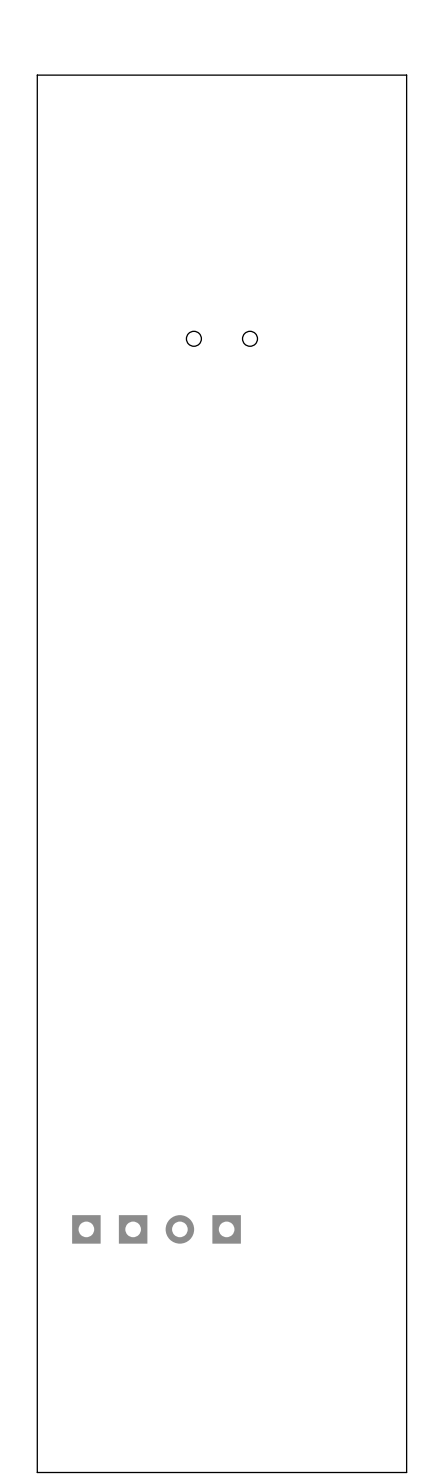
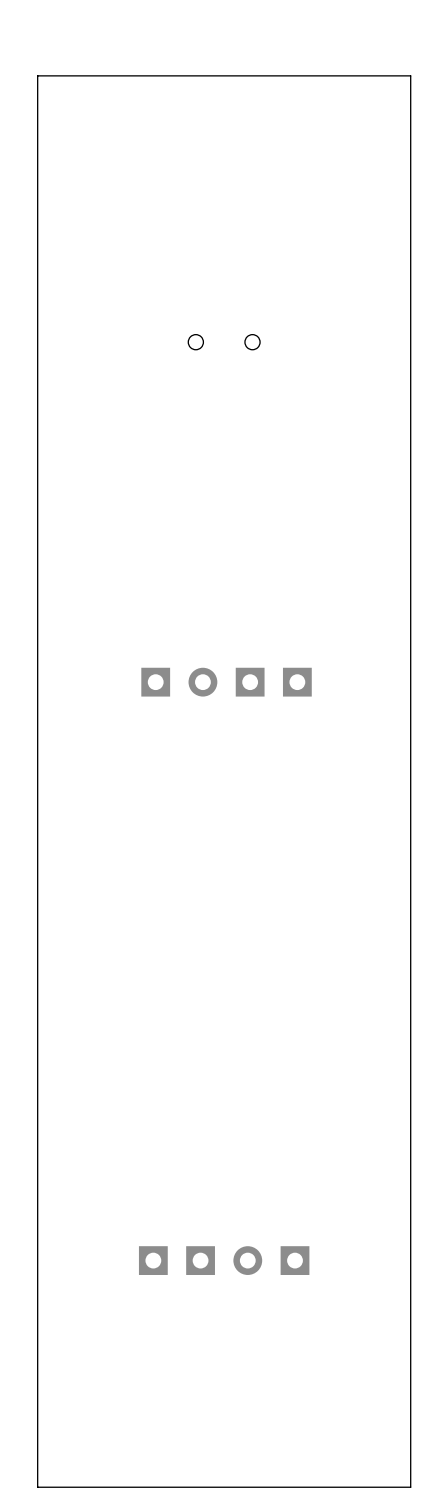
part: none -> (226, 682)
part position: (156, 1229) -> (224, 1260)

